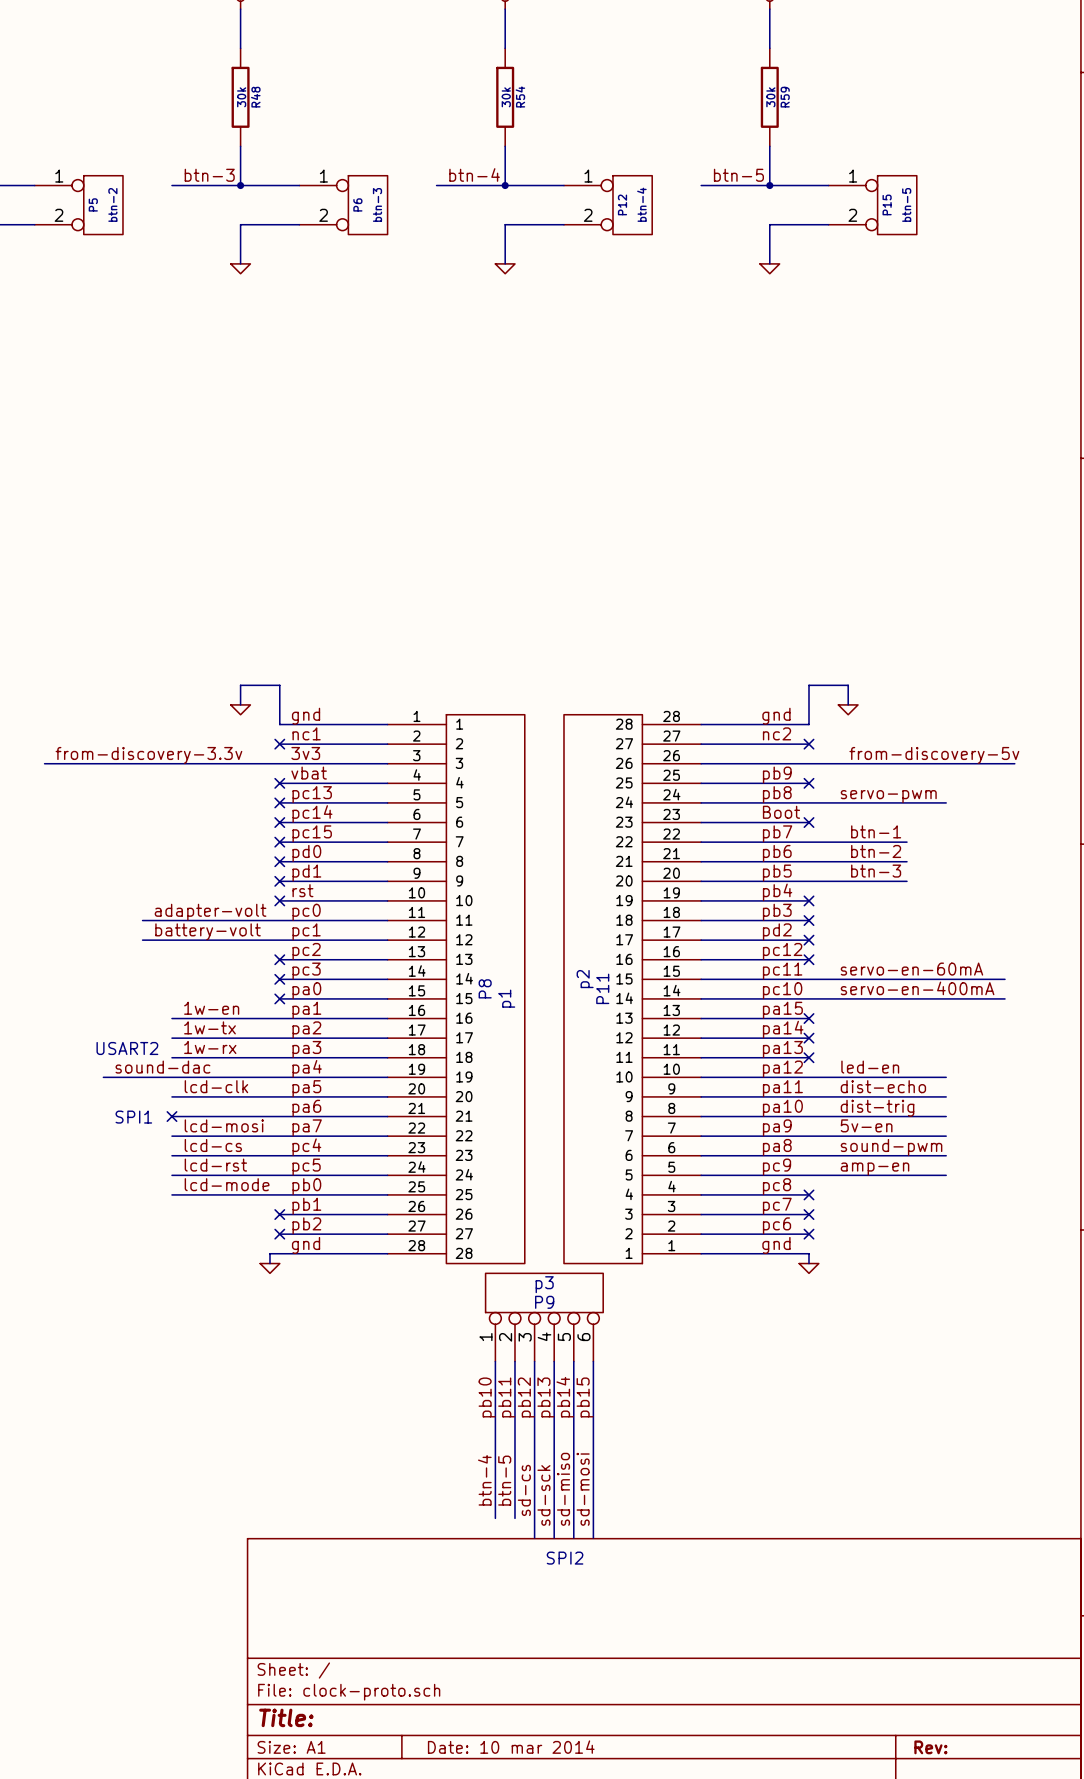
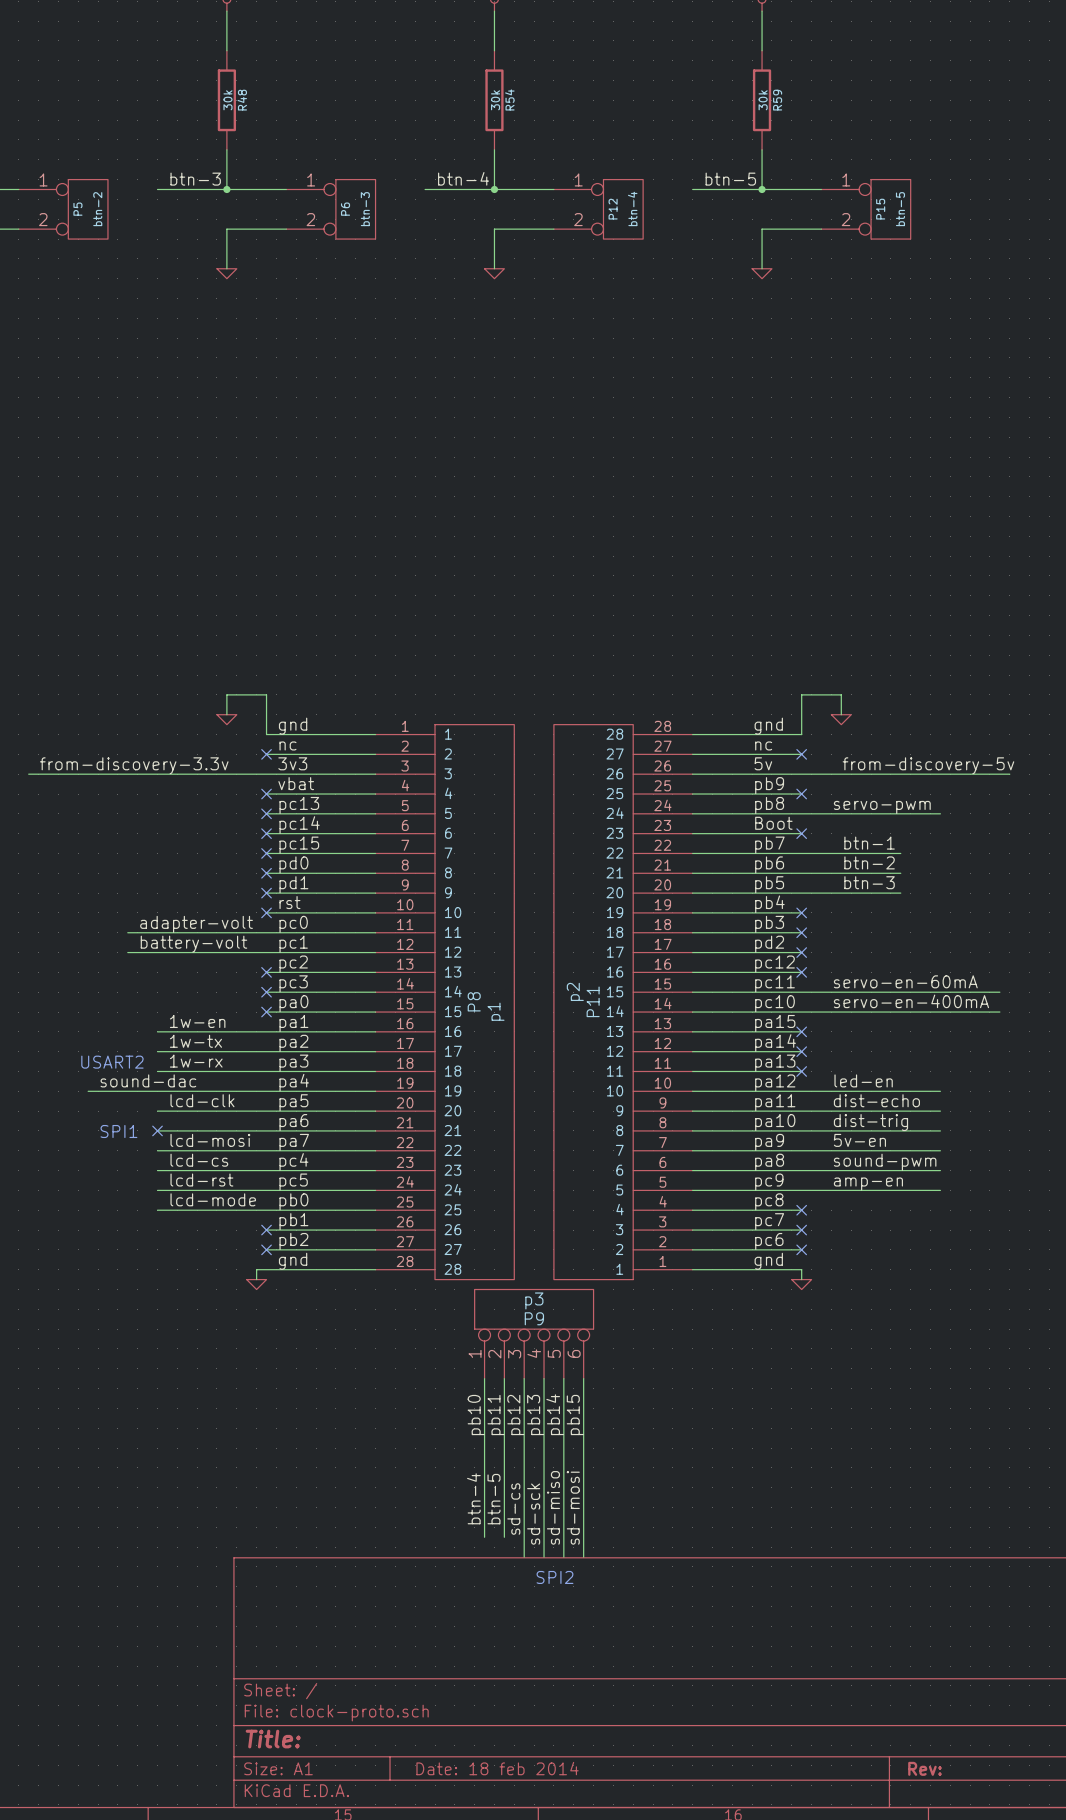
label: nc1 (306, 733) -> nc (287, 745)
label: nc2 (777, 733) -> nc (763, 745)
label: none -> 5v (763, 763)
title block: Date: 10 mar 2014 (511, 1747) -> Date: 18 feb 2014 (497, 1768)

